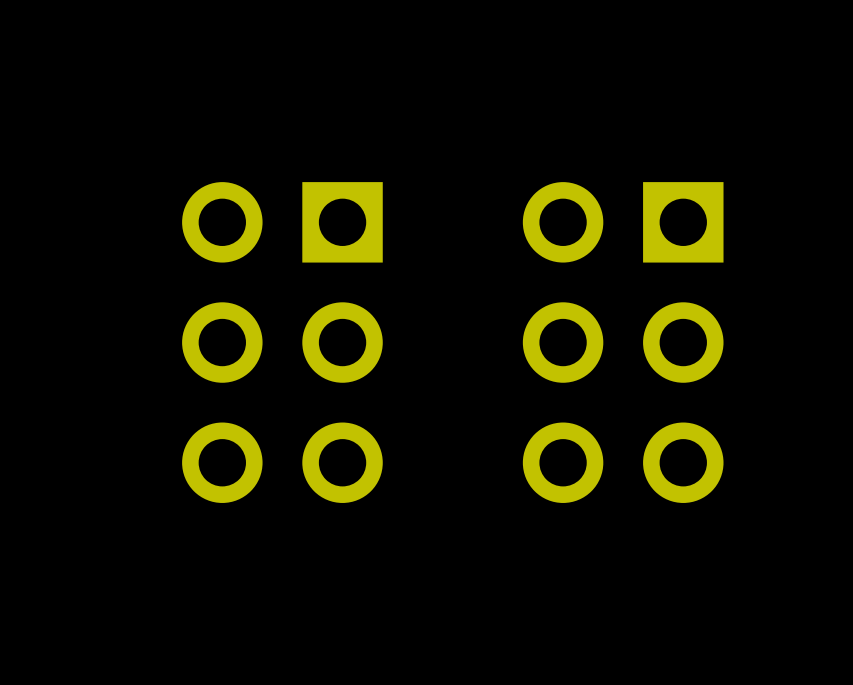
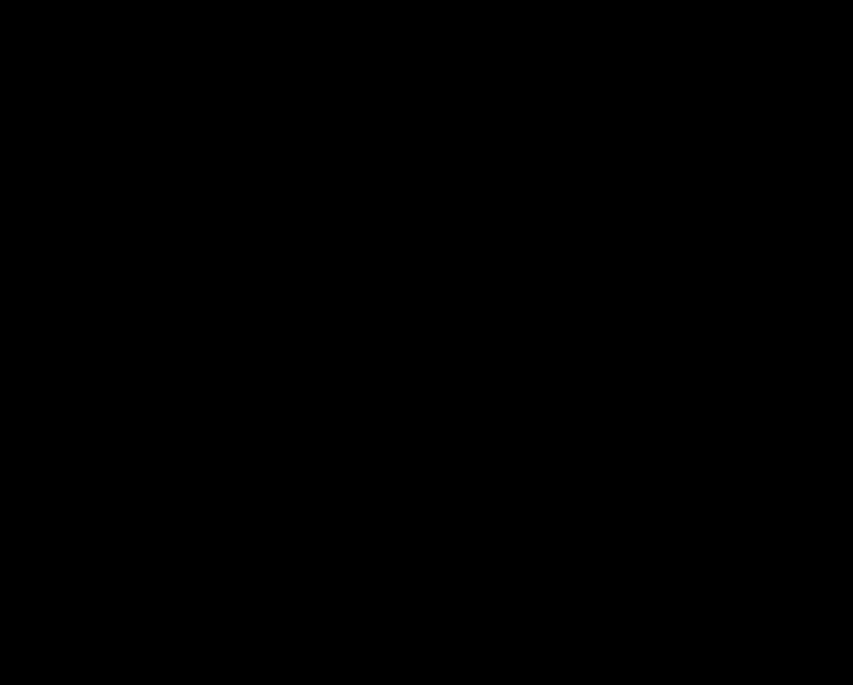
part: (282, 342) -> none
part: (623, 342) -> none

